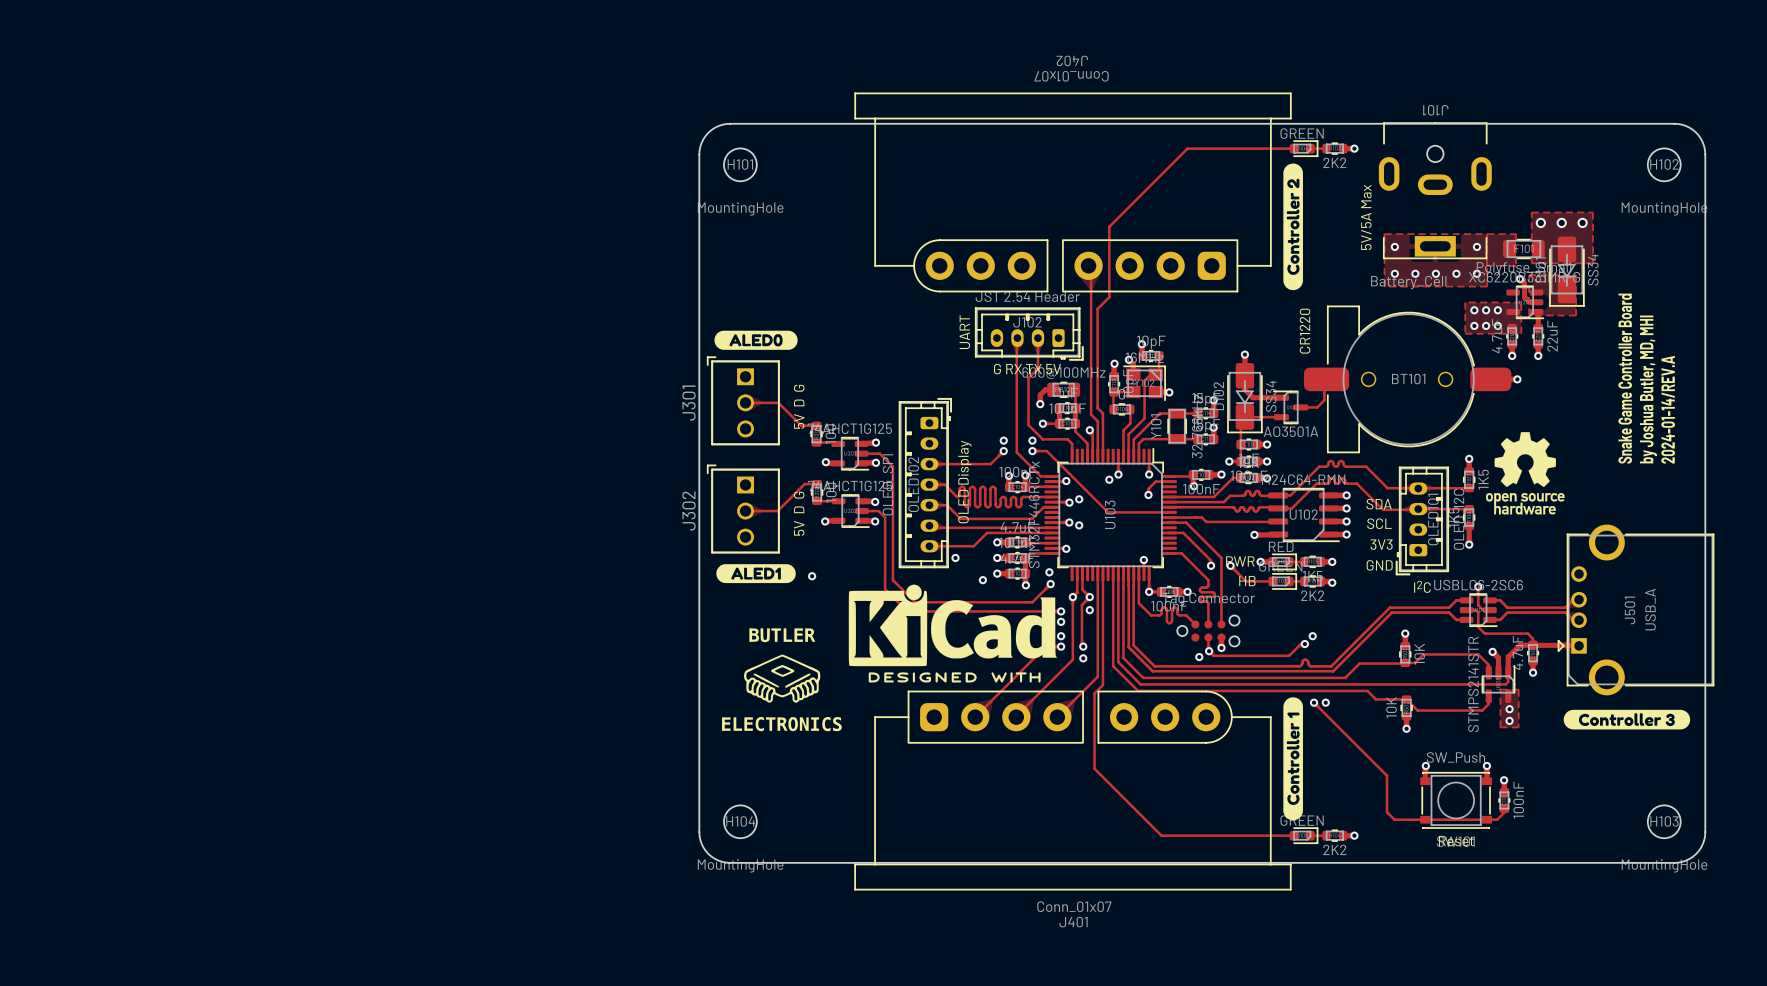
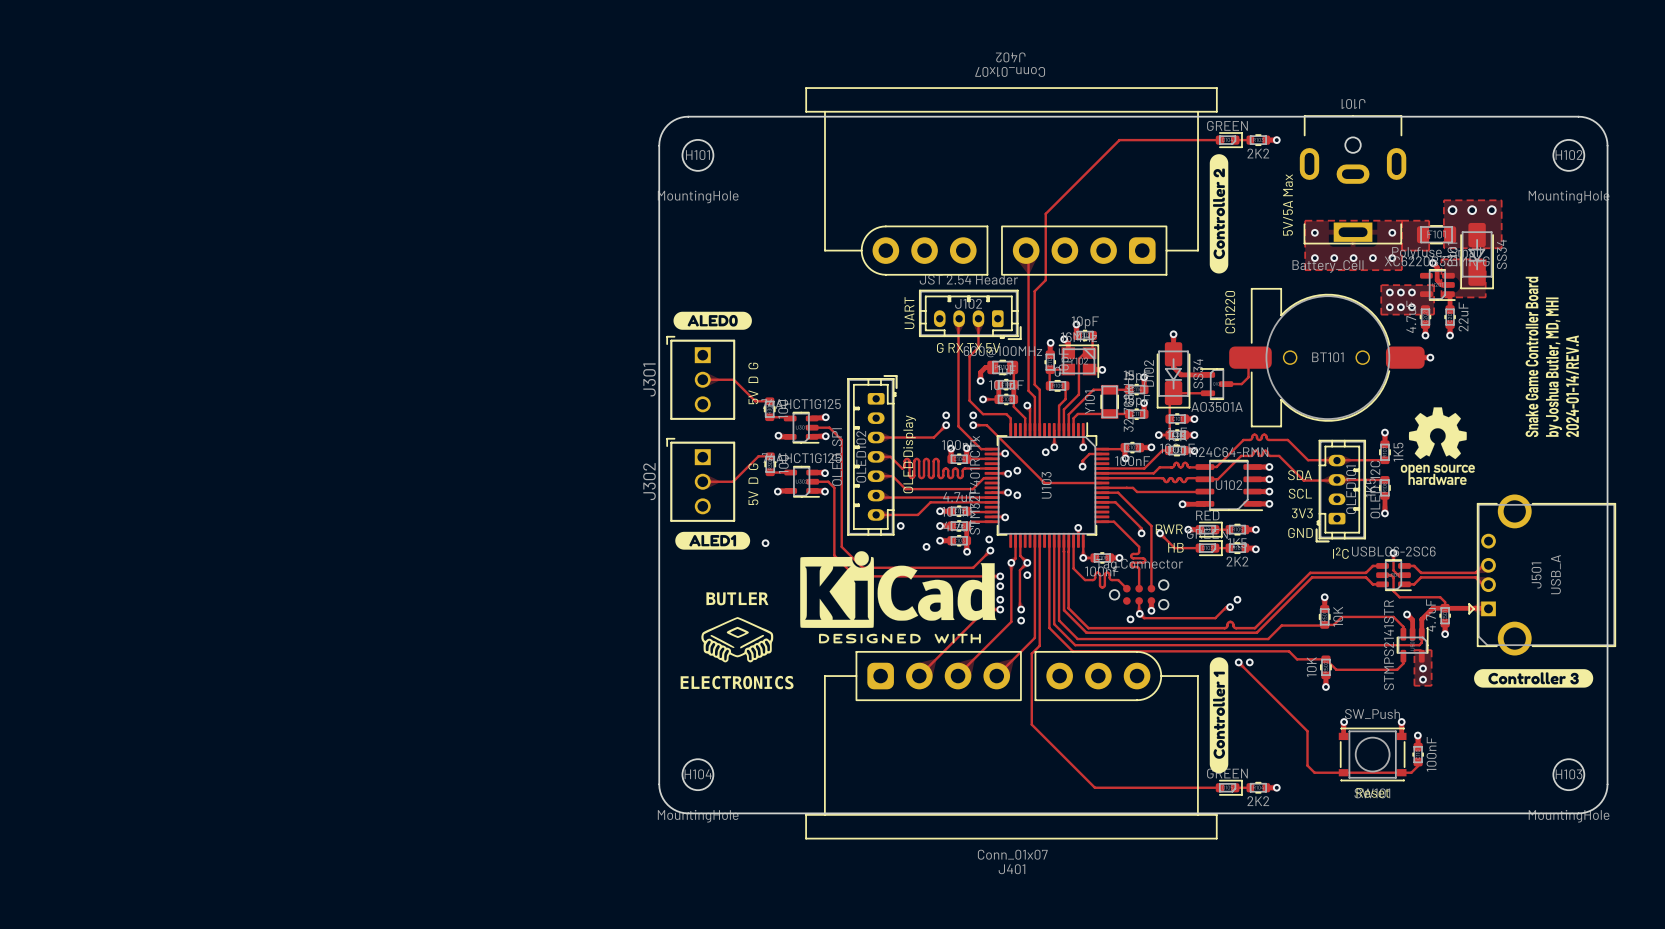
U103 value: STM32F446RCTx (1034, 514) -> STM32F401RCTx (975, 485)

